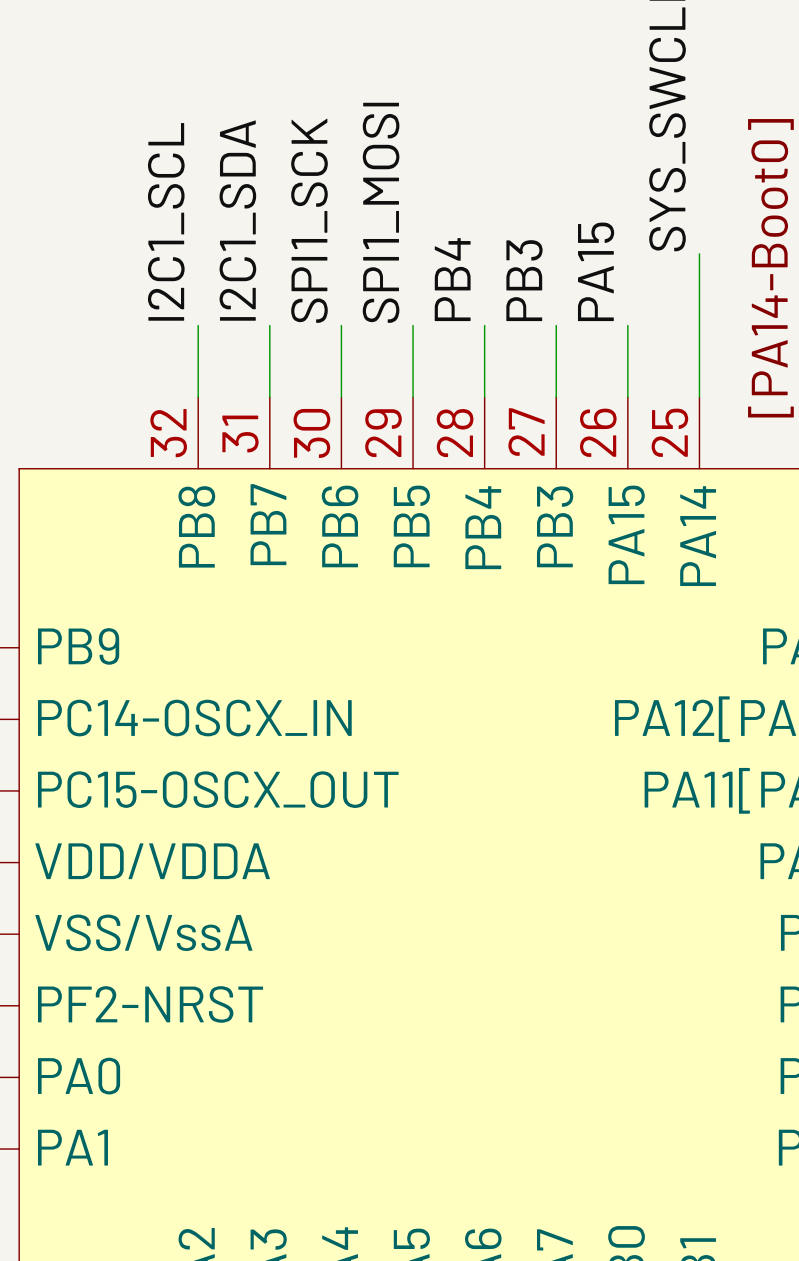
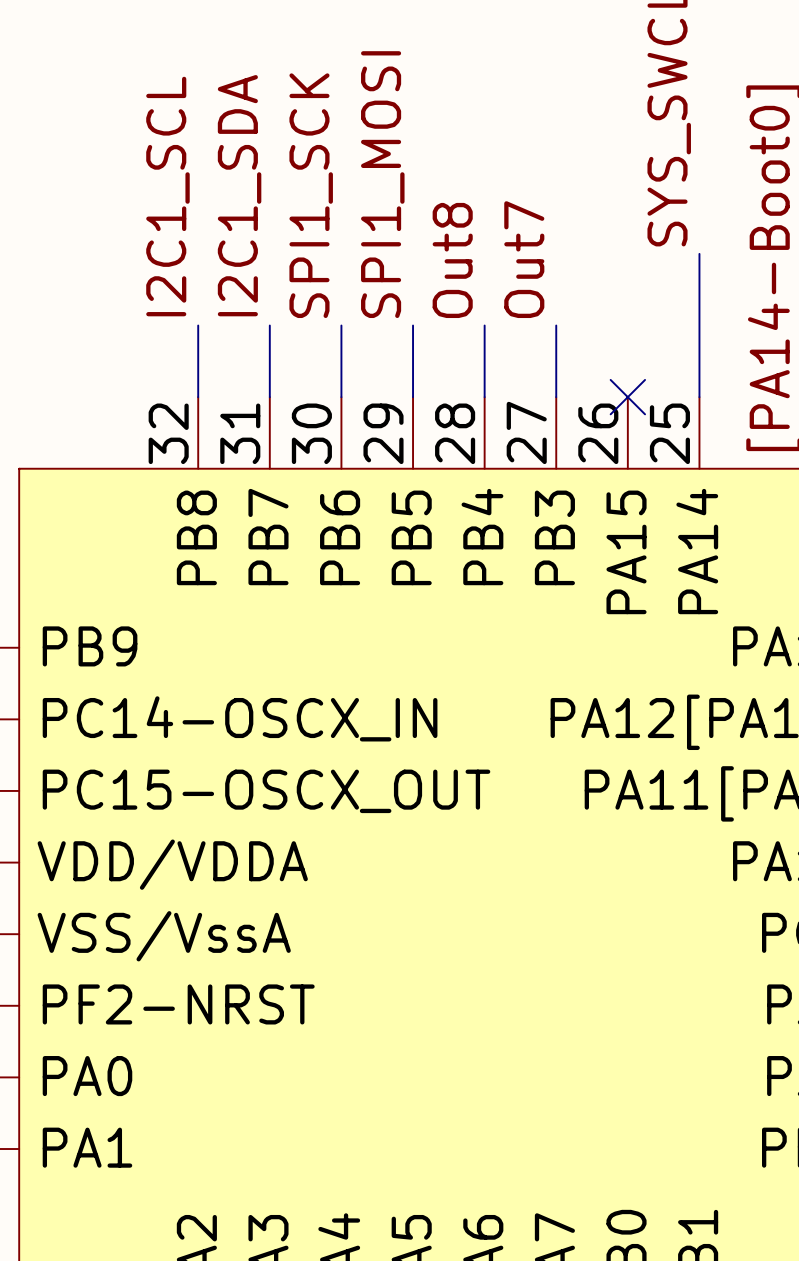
label: PA15 (596, 271) -> none
label: PB4 (452, 279) -> Out8 (452, 260)
label: PB3 (524, 280) -> Out7 (524, 259)
wire: (627, 325) (627, 397) -> none
no-connect mark: none -> (627, 397)

